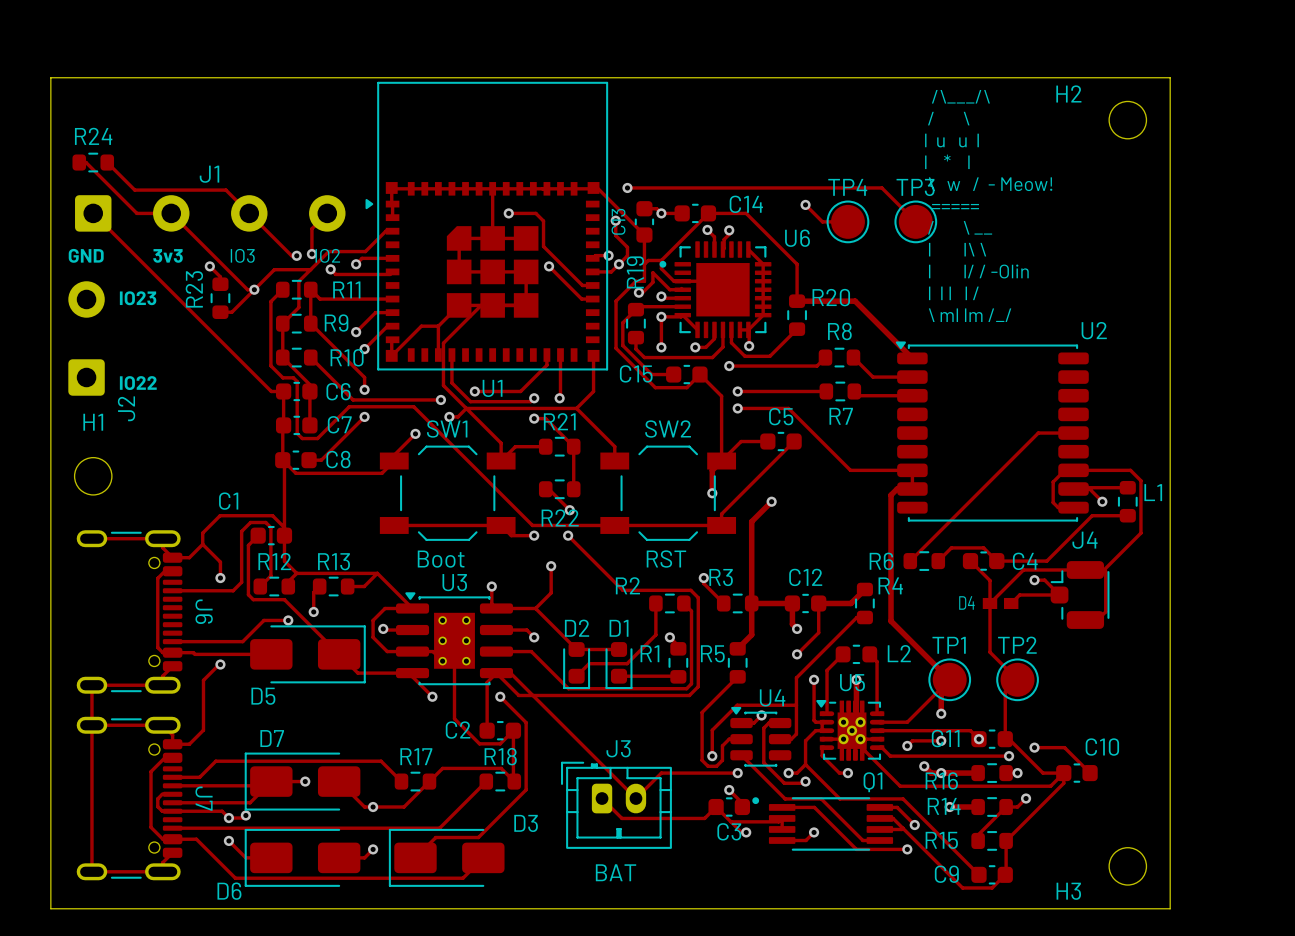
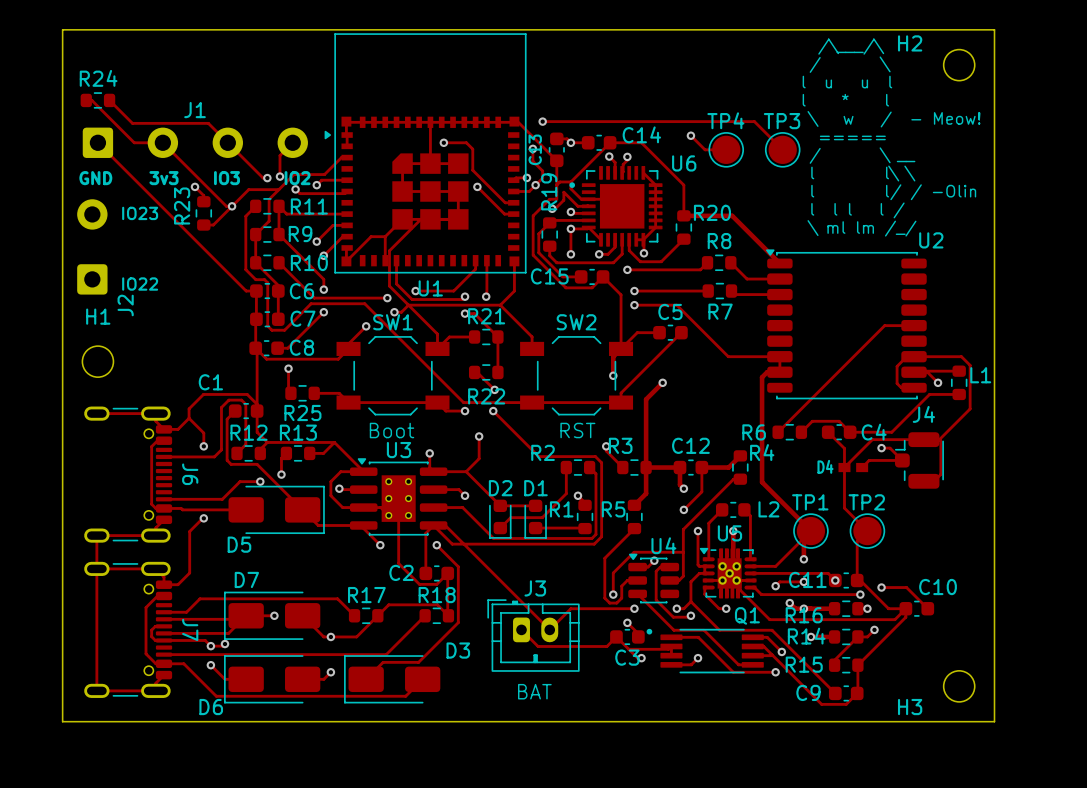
track: none -> (288, 368) (288, 390) (290, 393)
via: none -> (288, 368)
R25: none -> (302, 393)
track: none -> (314, 393) (339, 393) (348, 402)

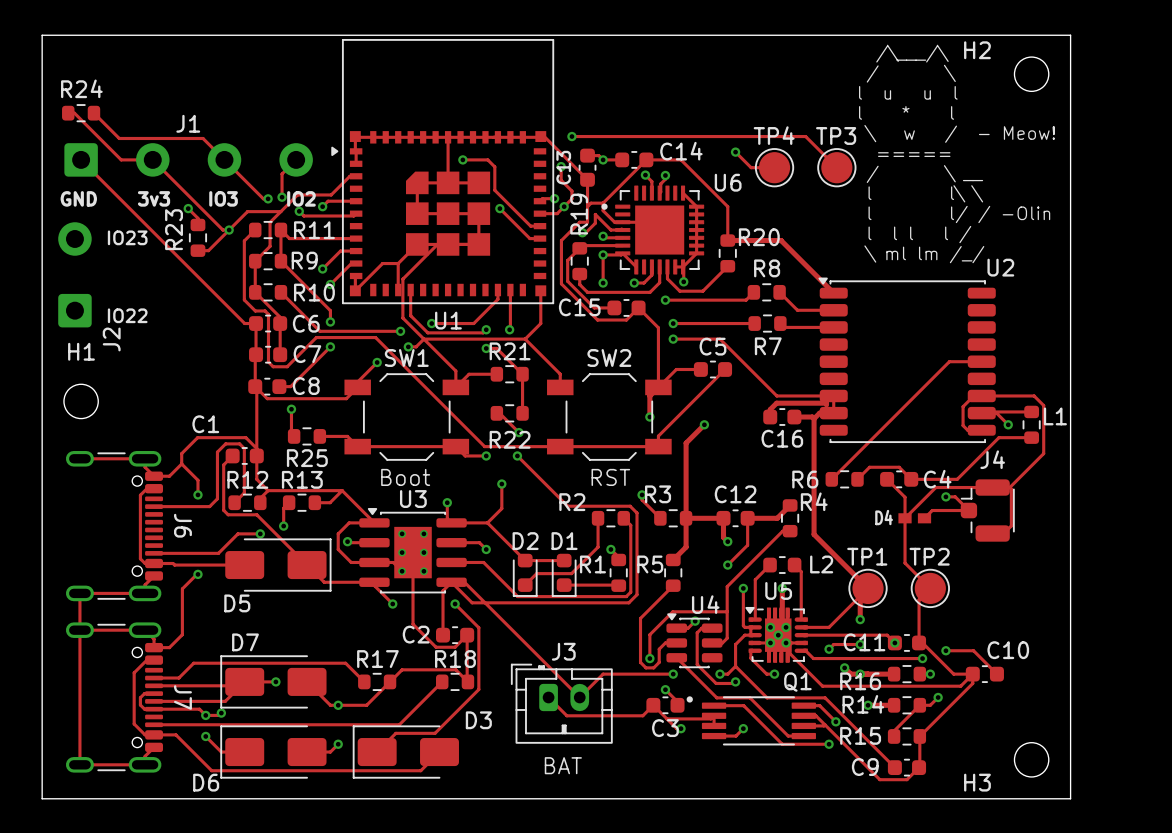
track: none -> (826, 404) (826, 403) (776, 403) (770, 409) (770, 417)
C16: none -> (782, 417)
track: none -> (794, 417) (812, 417) (814, 418)

